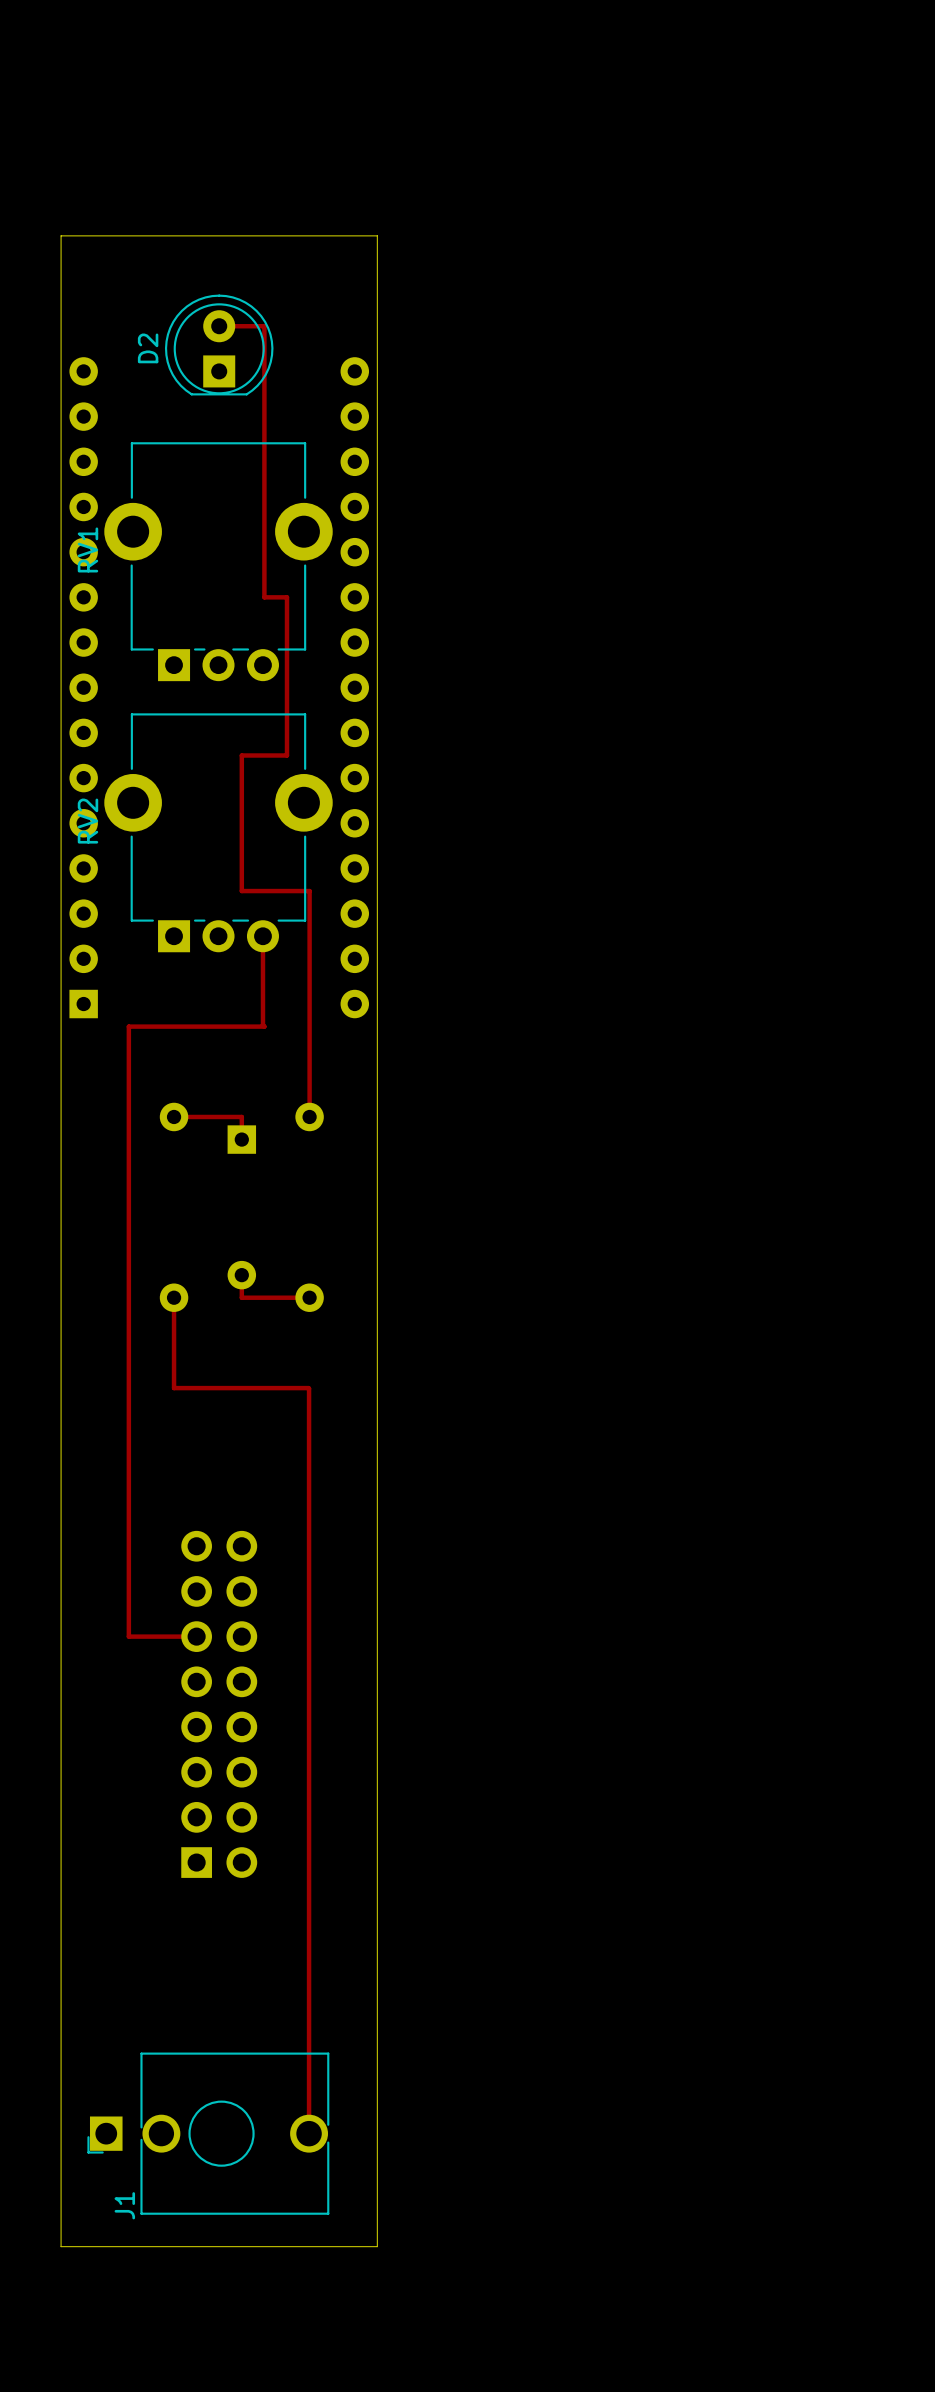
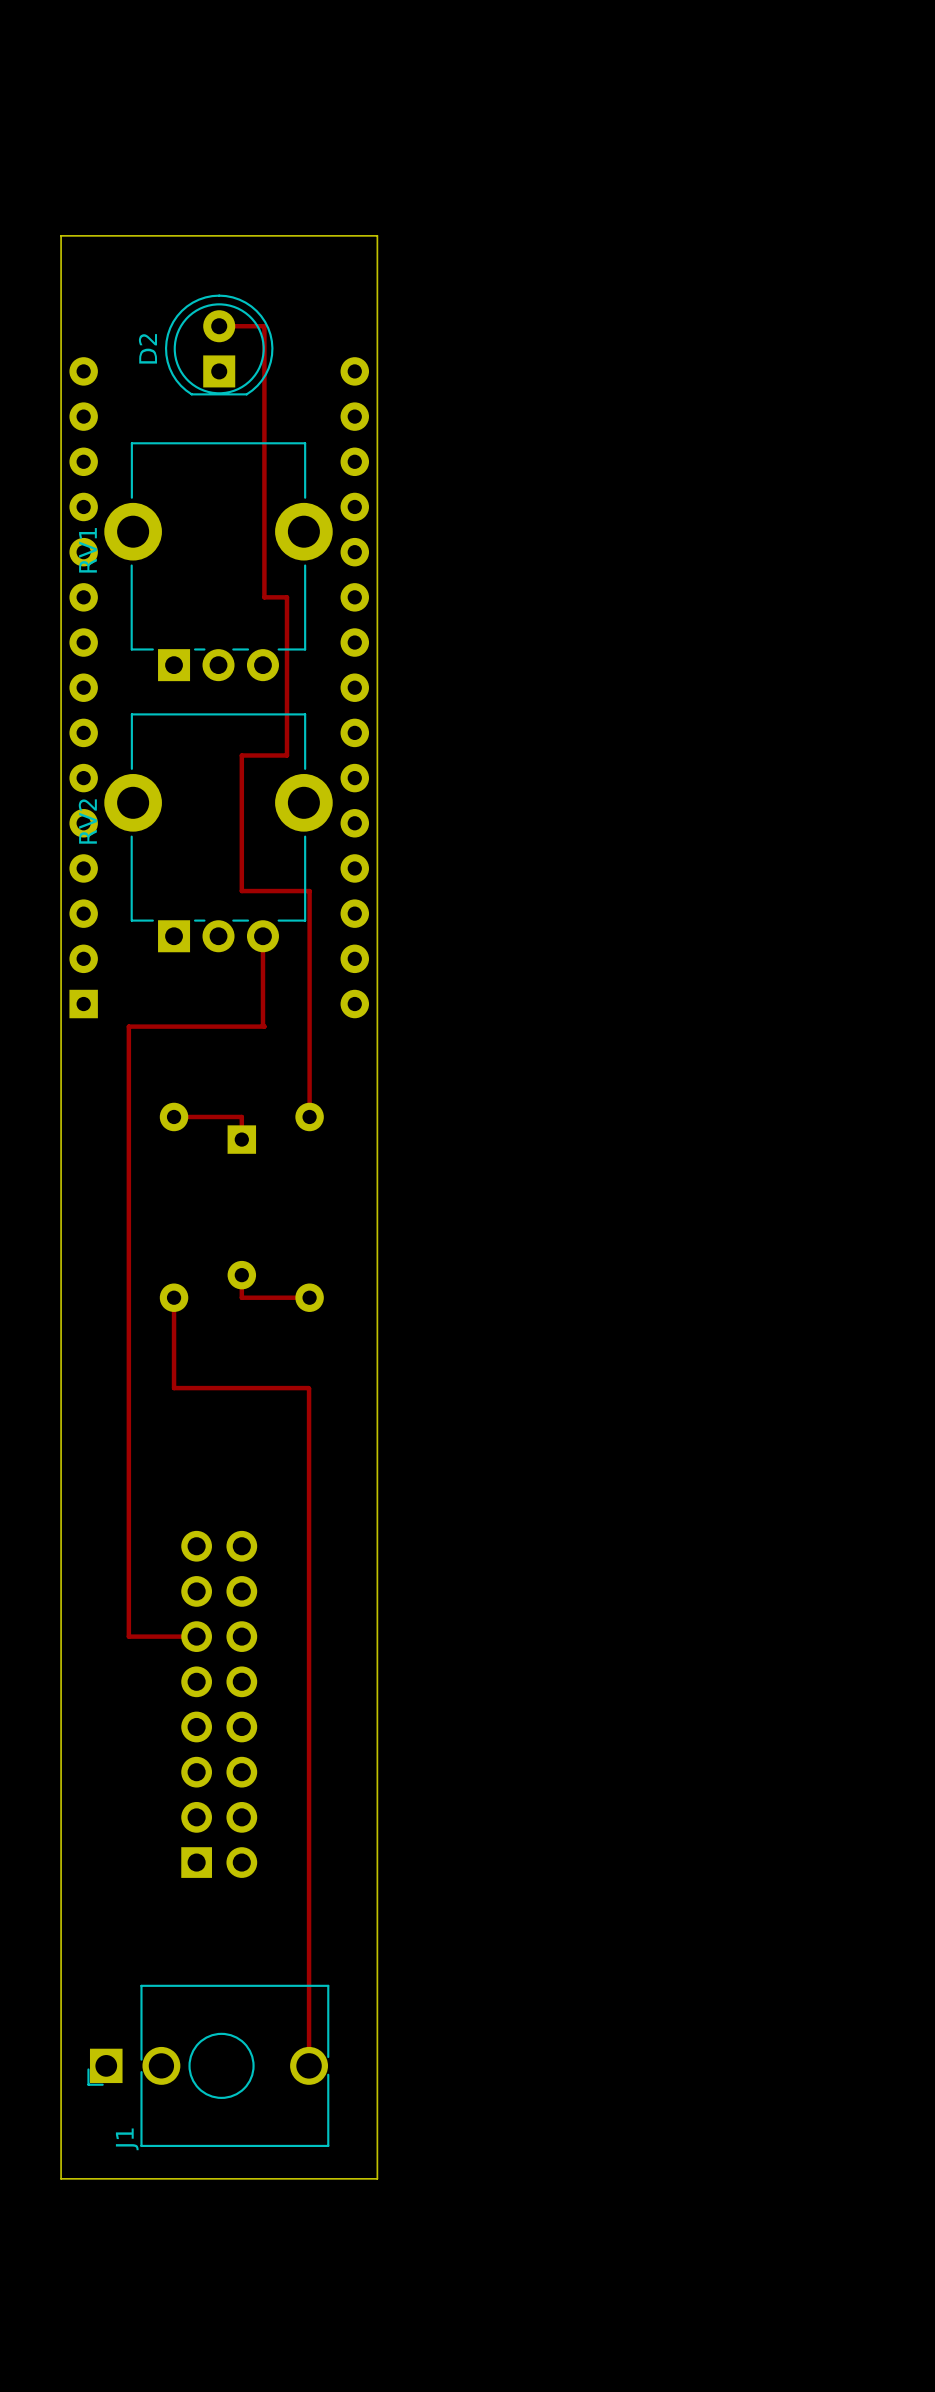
track: (309, 2065) (309, 2133) -> none
J1 position: (208, 2133) -> (208, 2065)
board edge: (61, 2178) (61, 2246) (377, 2246) (377, 2178) -> (61, 2178) (377, 2178)

